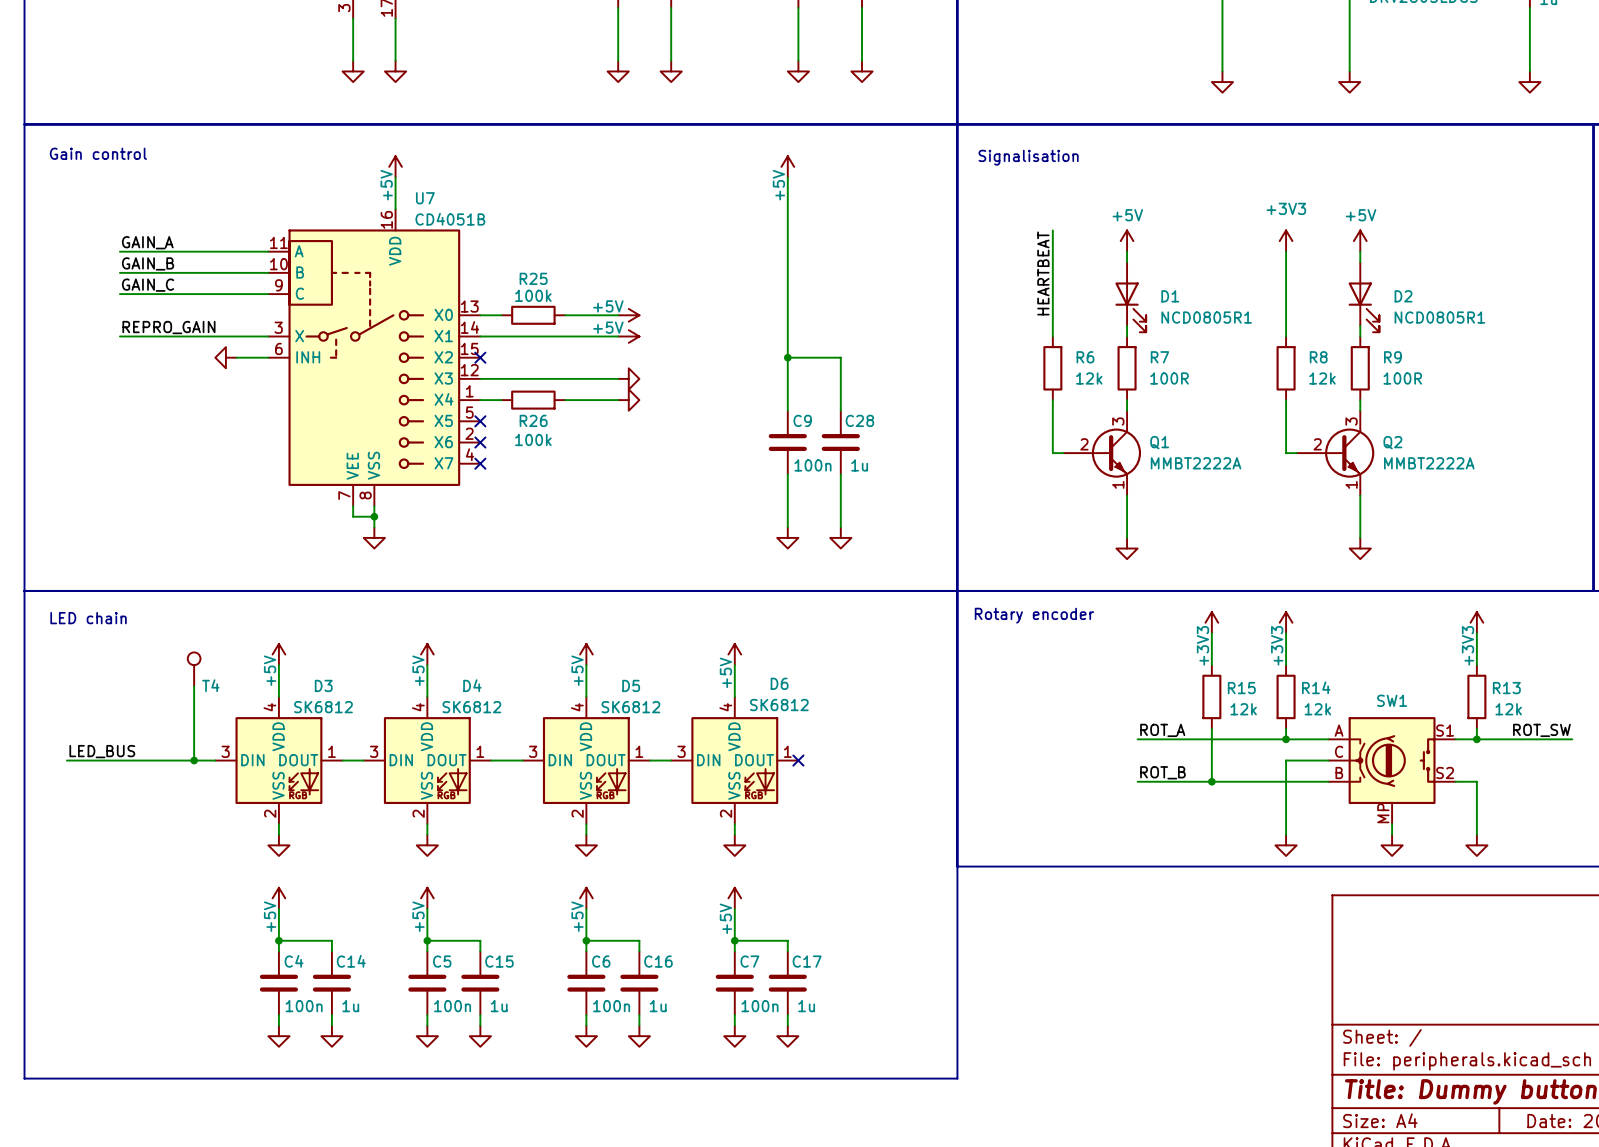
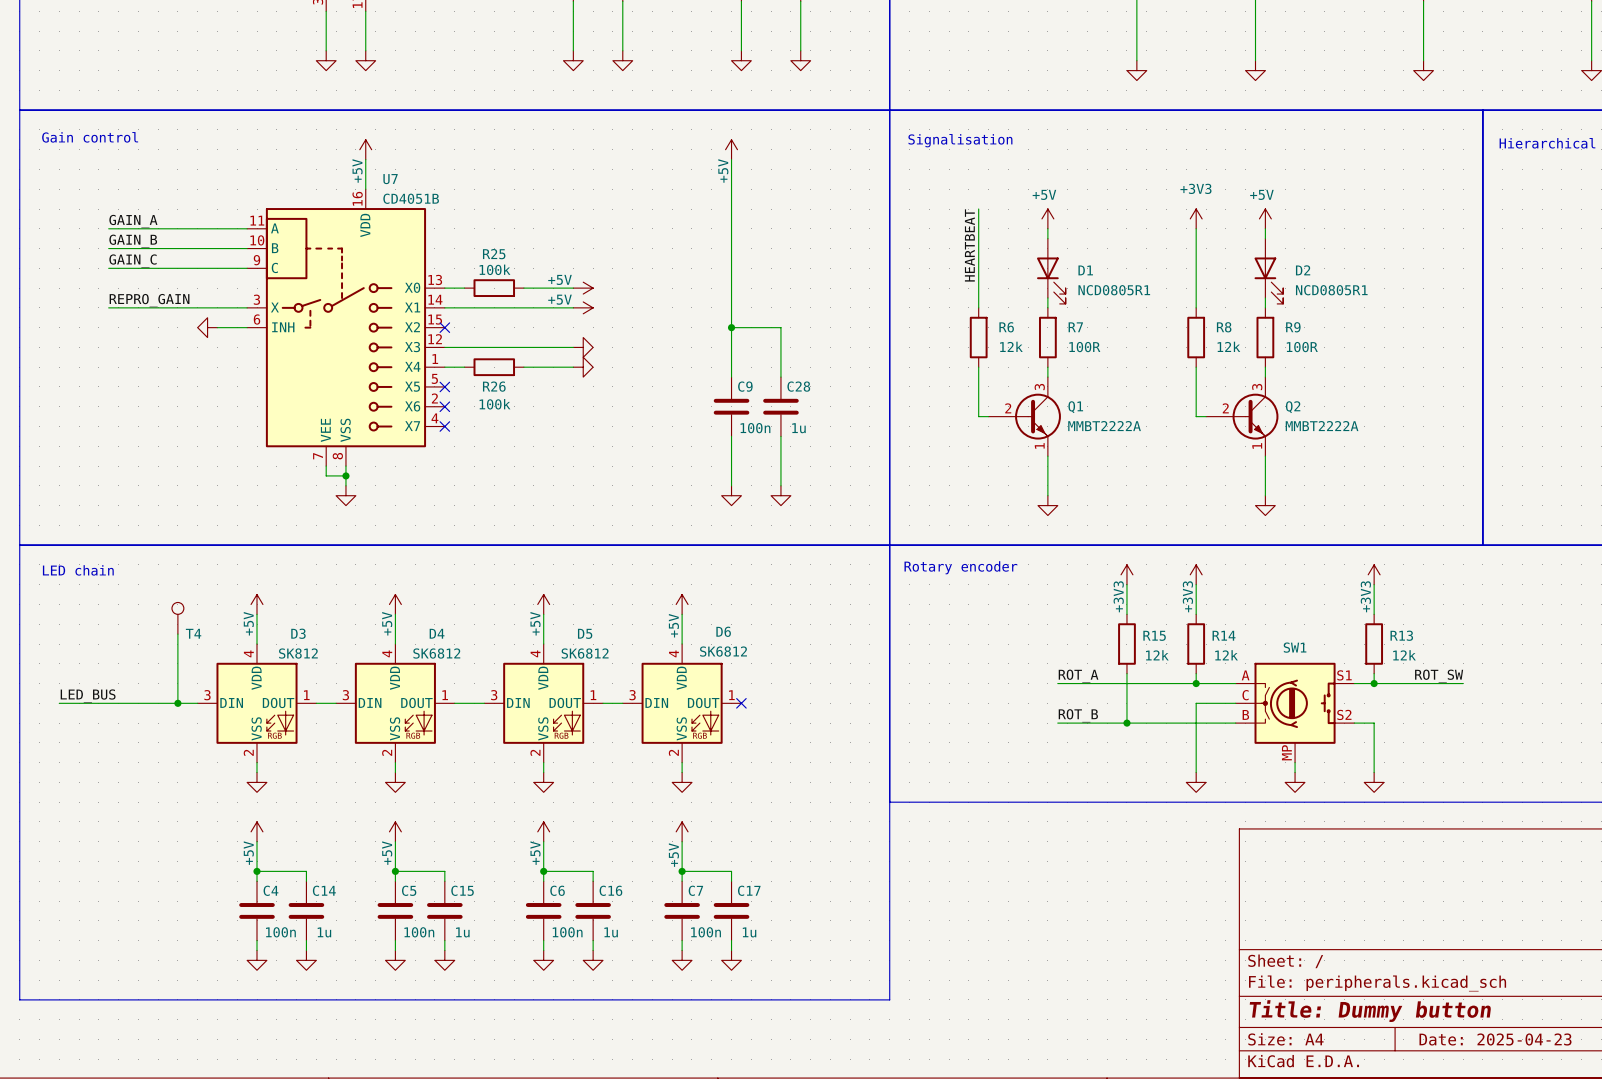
D3 value: SK6812 (323, 707) -> SK812 (298, 653)

